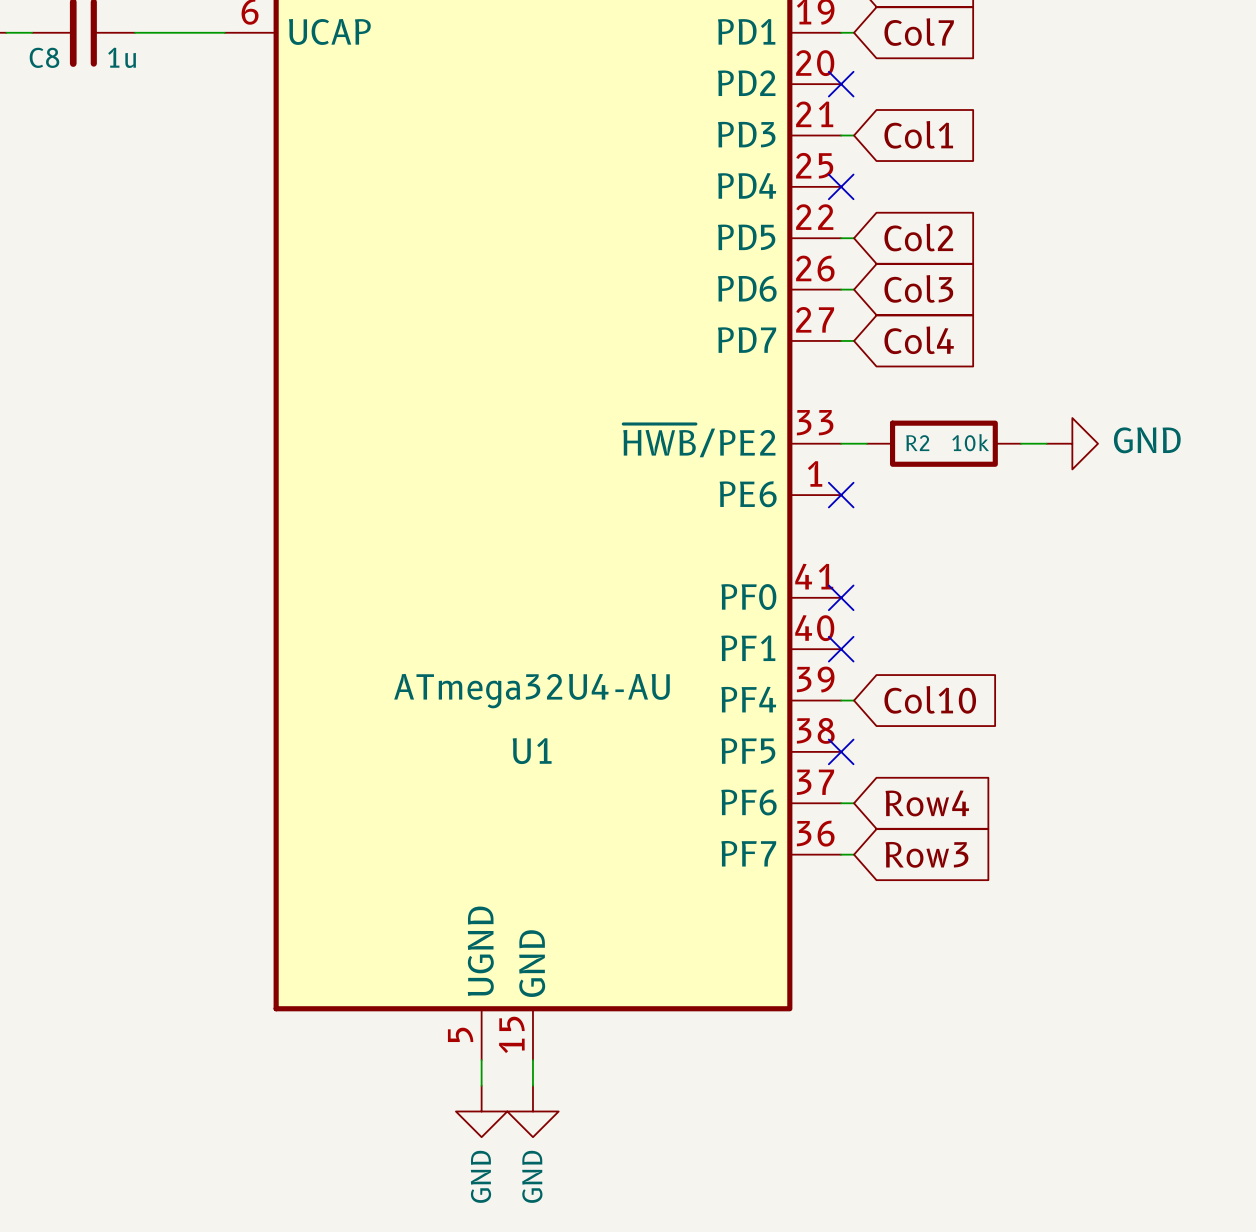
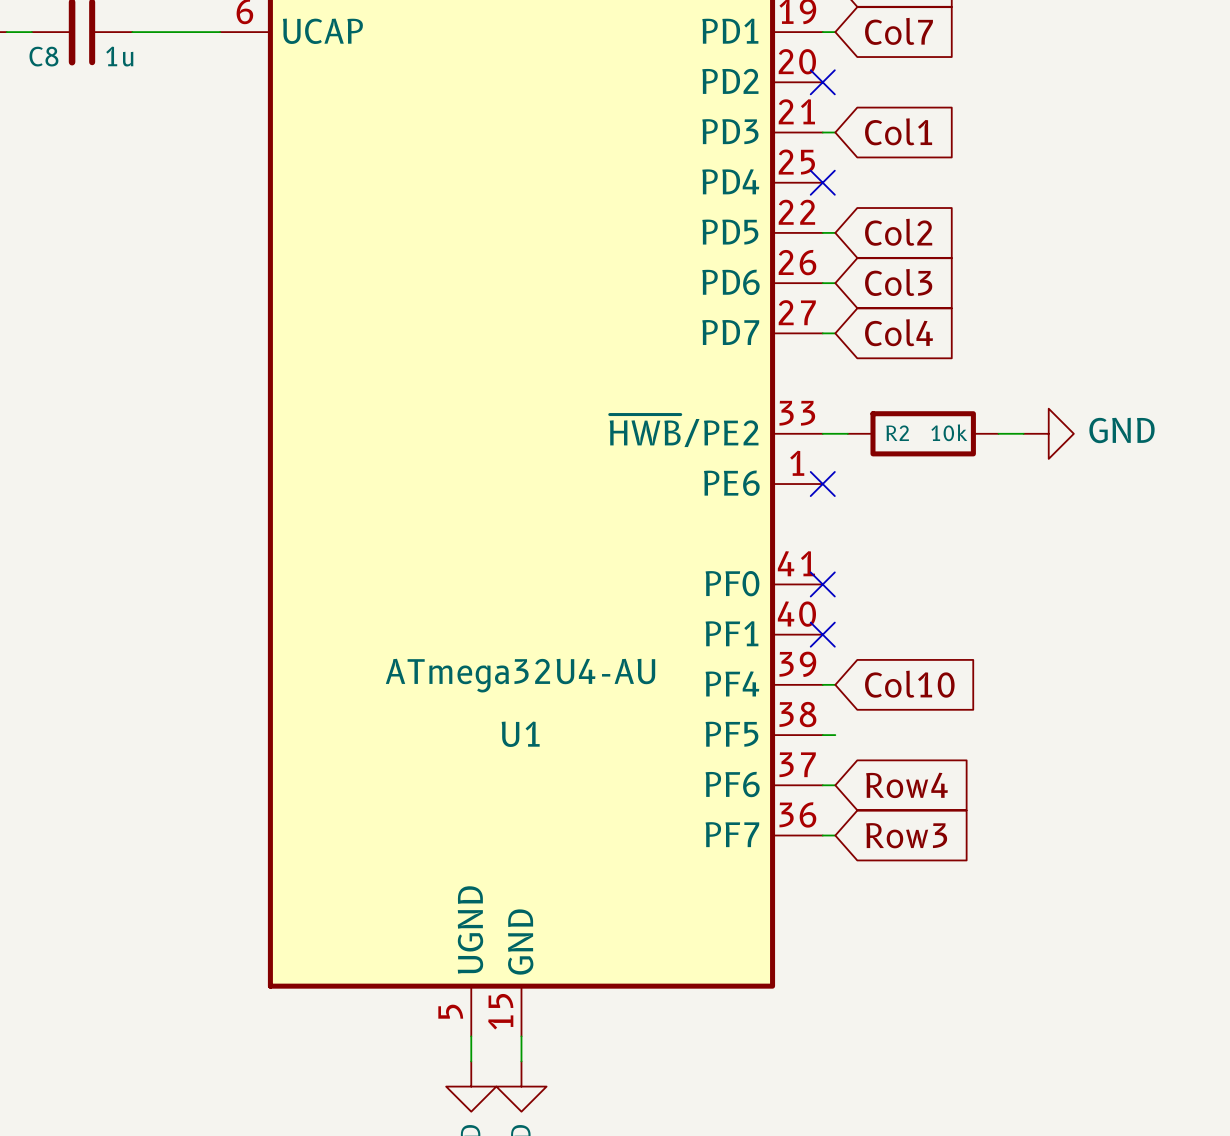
wire: none -> (822, 735) (835, 735)
no-connect mark: (841, 751) -> none

